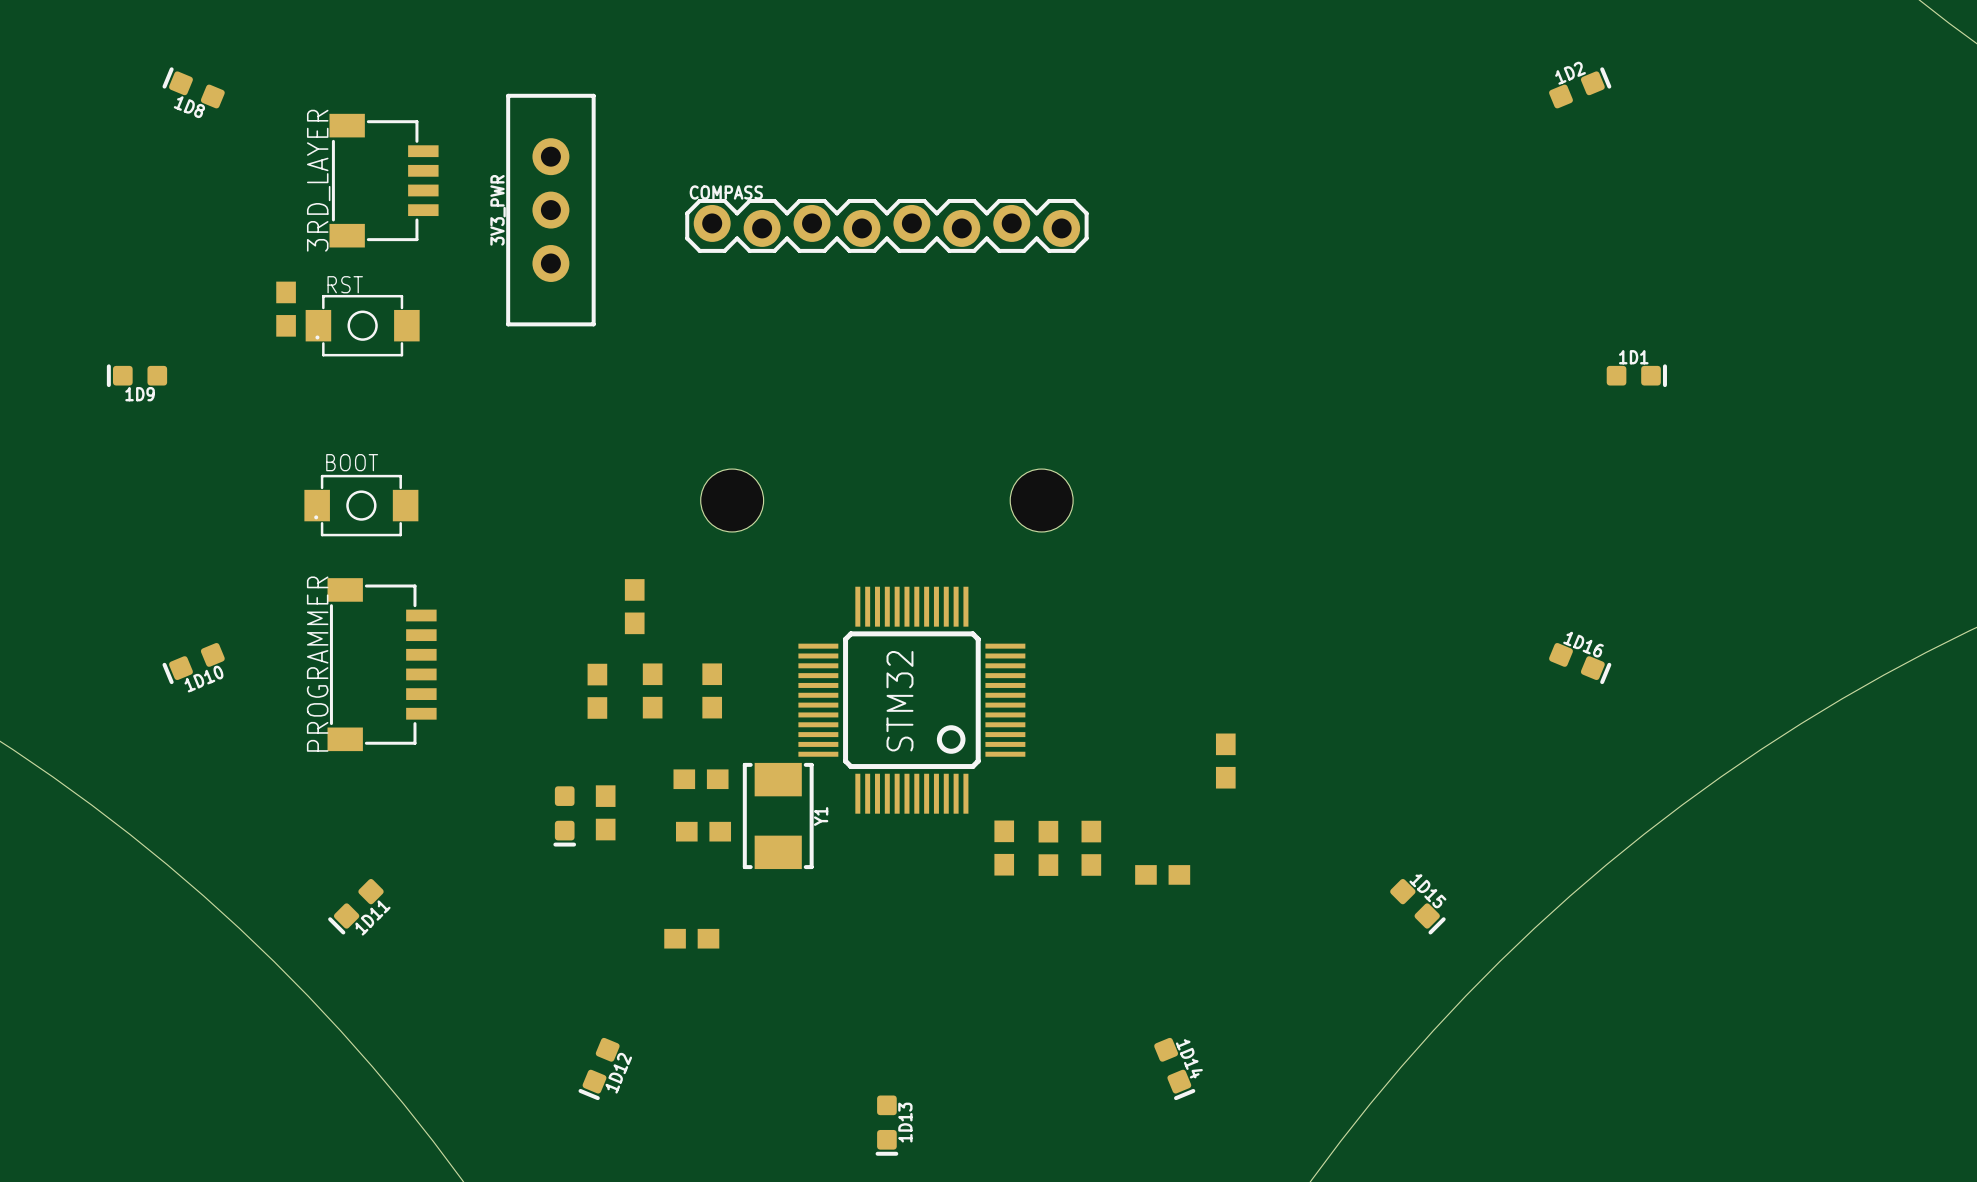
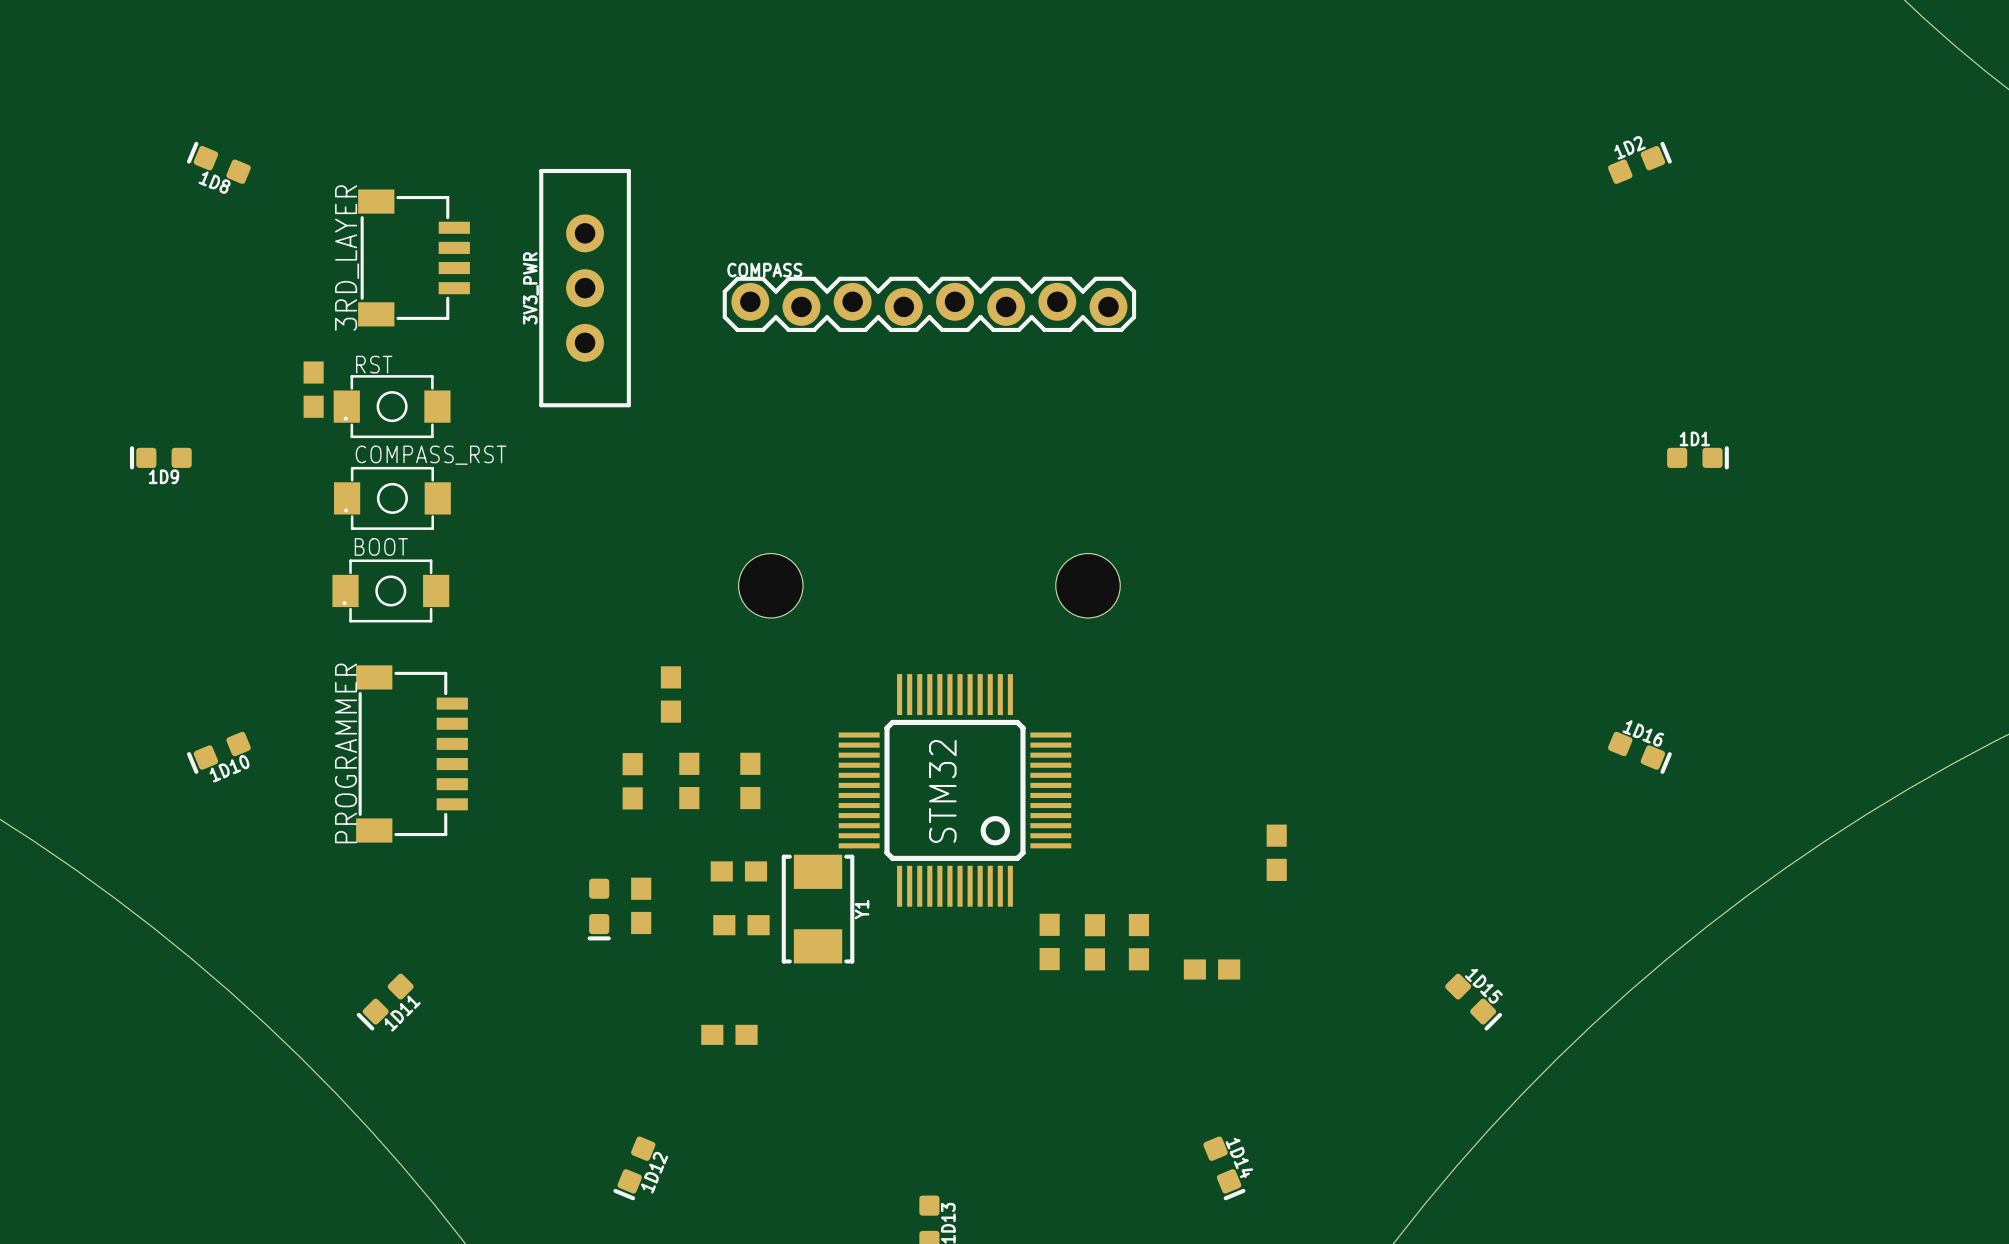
COMPASS_RST: none -> (392, 498)

